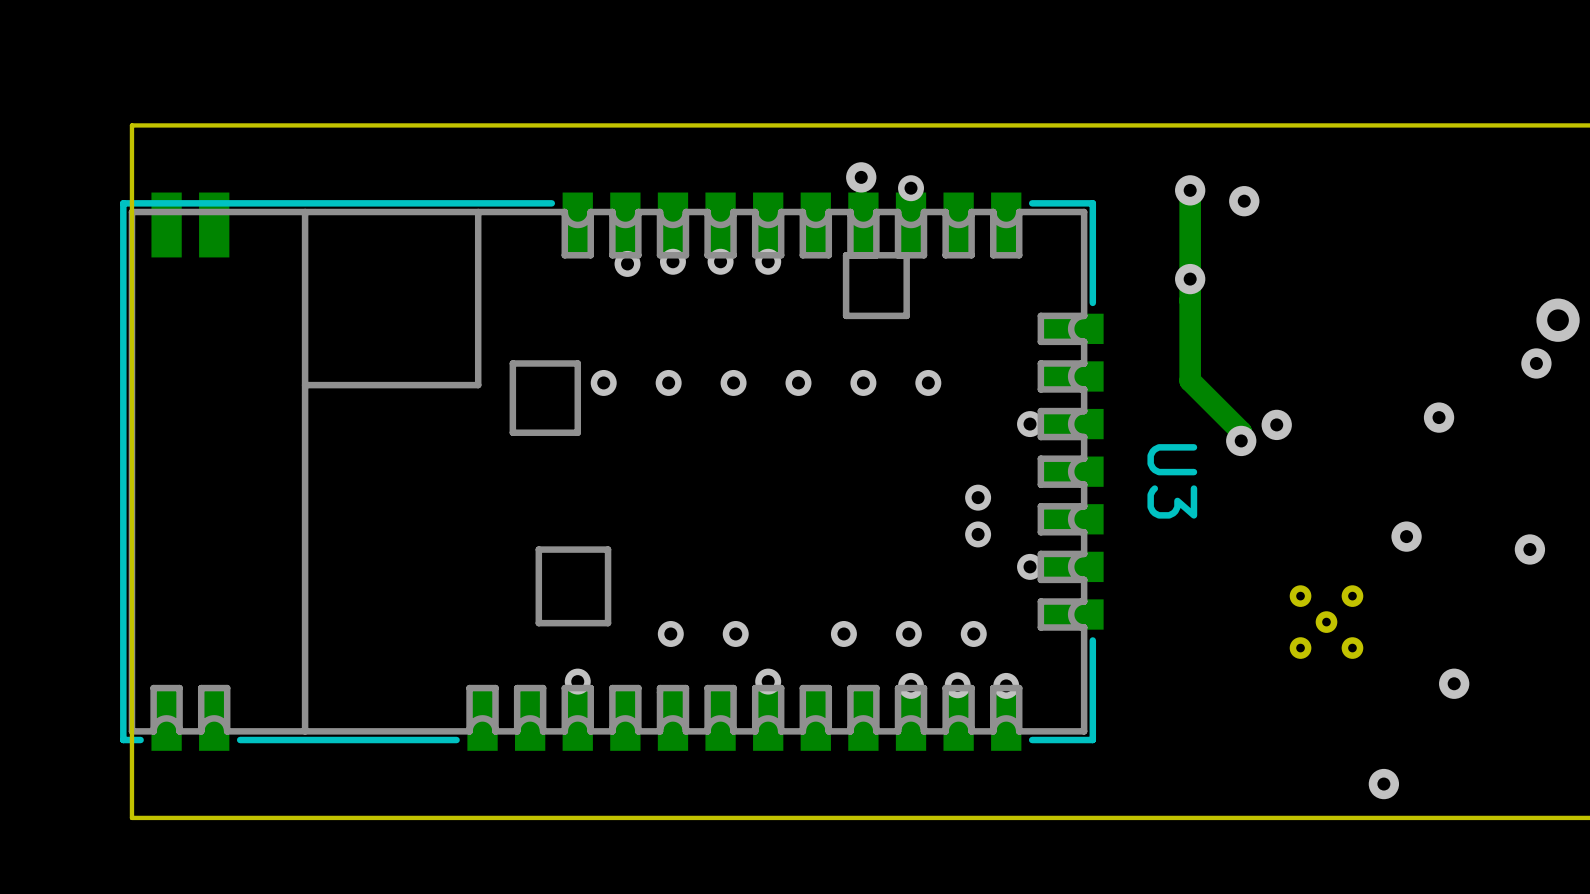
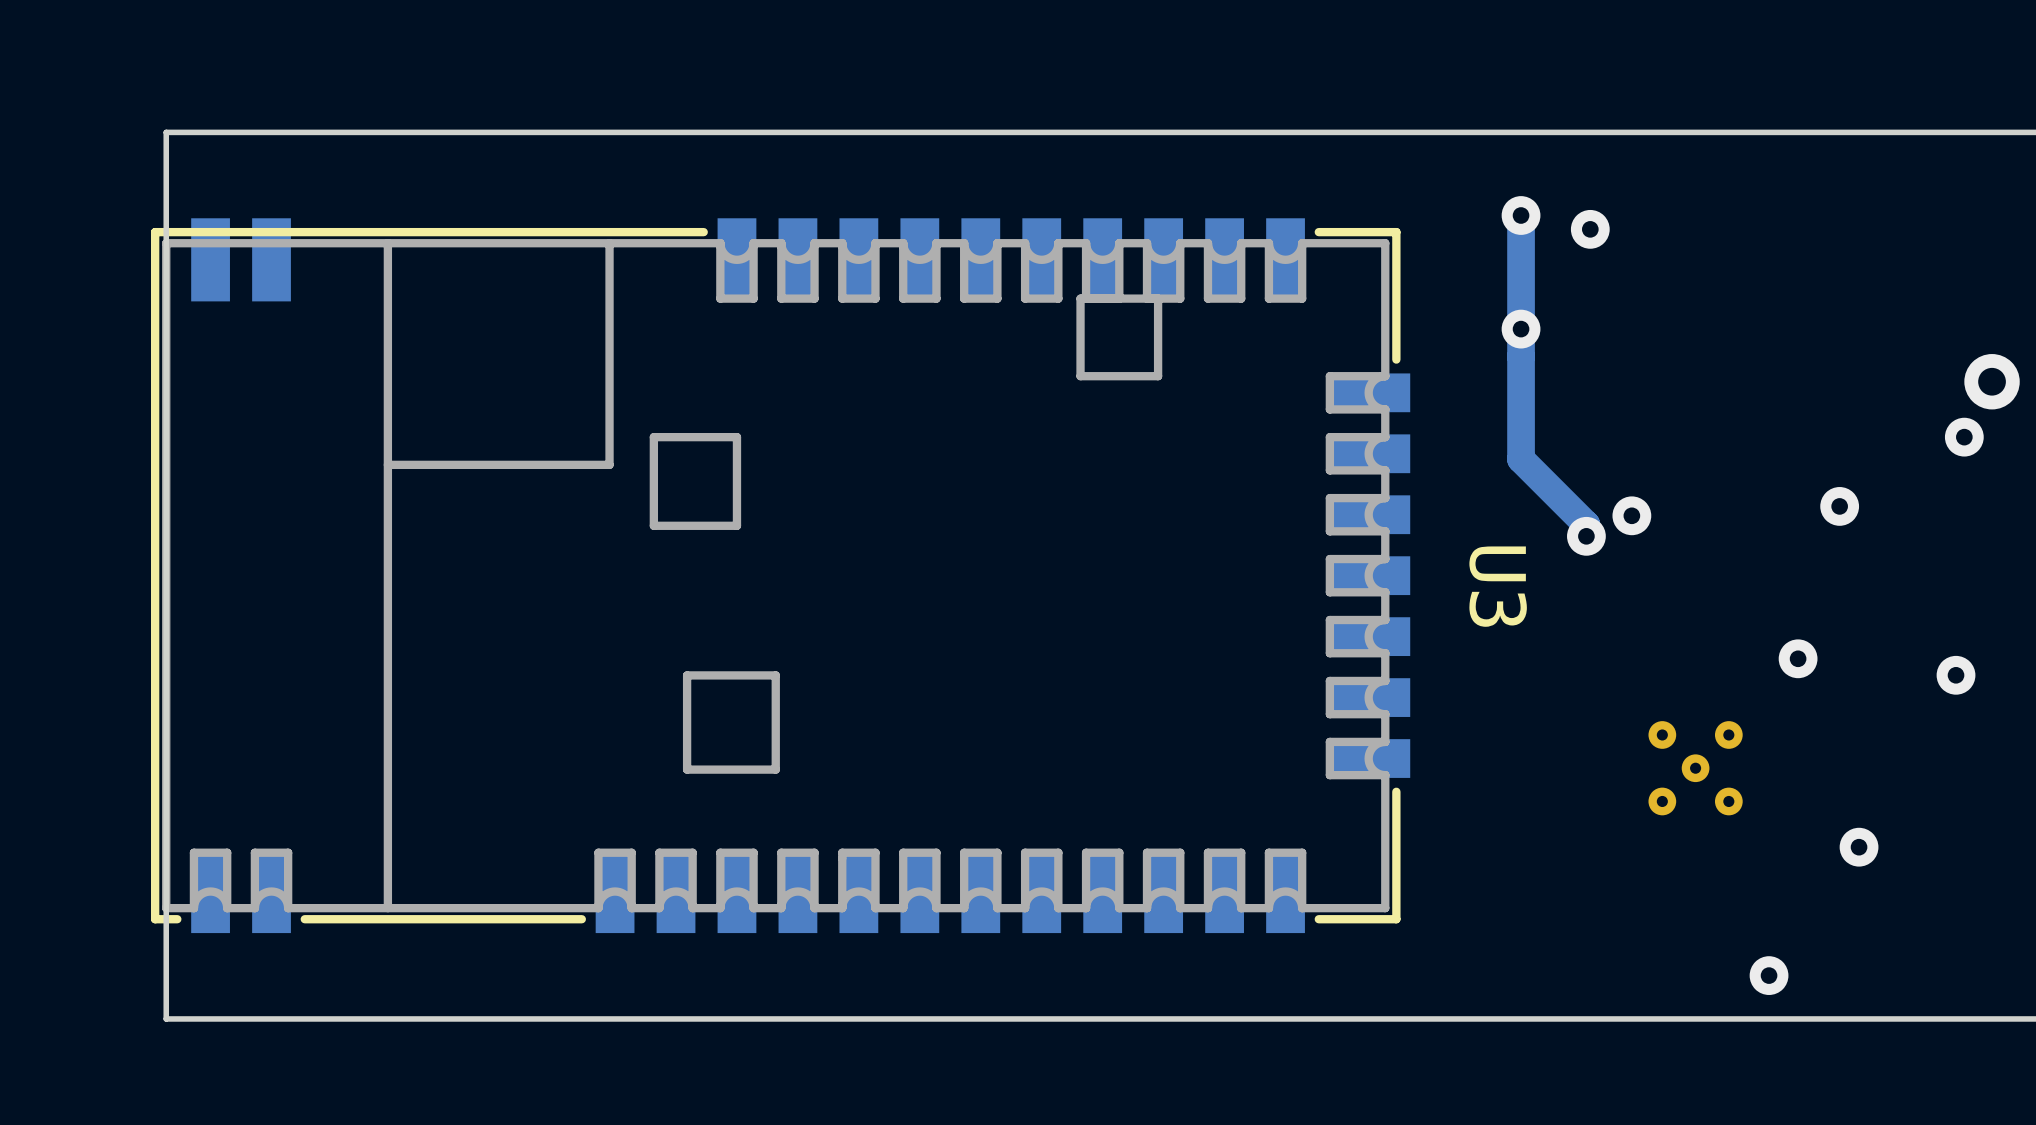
via: (861, 177) -> none
via: (911, 188) -> none
via: (672, 261) -> none
via: (720, 261) -> none
via: (768, 261) -> none
via: (627, 263) -> none
via: (603, 382) -> none
via: (668, 382) -> none
via: (733, 382) -> none
via: (798, 382) -> none
via: (863, 382) -> none
via: (928, 382) -> none
via: (1030, 424) -> none
via: (978, 497) -> none
via: (978, 534) -> none
via: (1030, 566) -> none
via: (670, 633) -> none
via: (735, 633) -> none
via: (843, 633) -> none
via: (908, 633) -> none
via: (973, 633) -> none
via: (577, 681) -> none
via: (768, 681) -> none
via: (911, 685) -> none
via: (957, 685) -> none
via: (1006, 685) -> none

